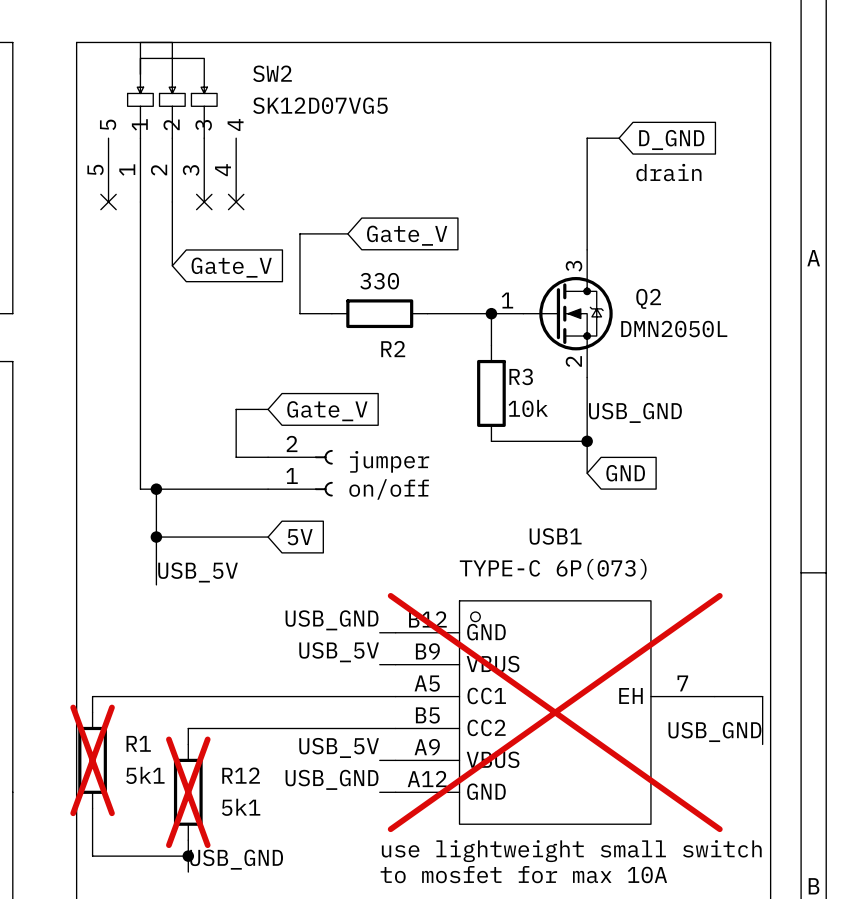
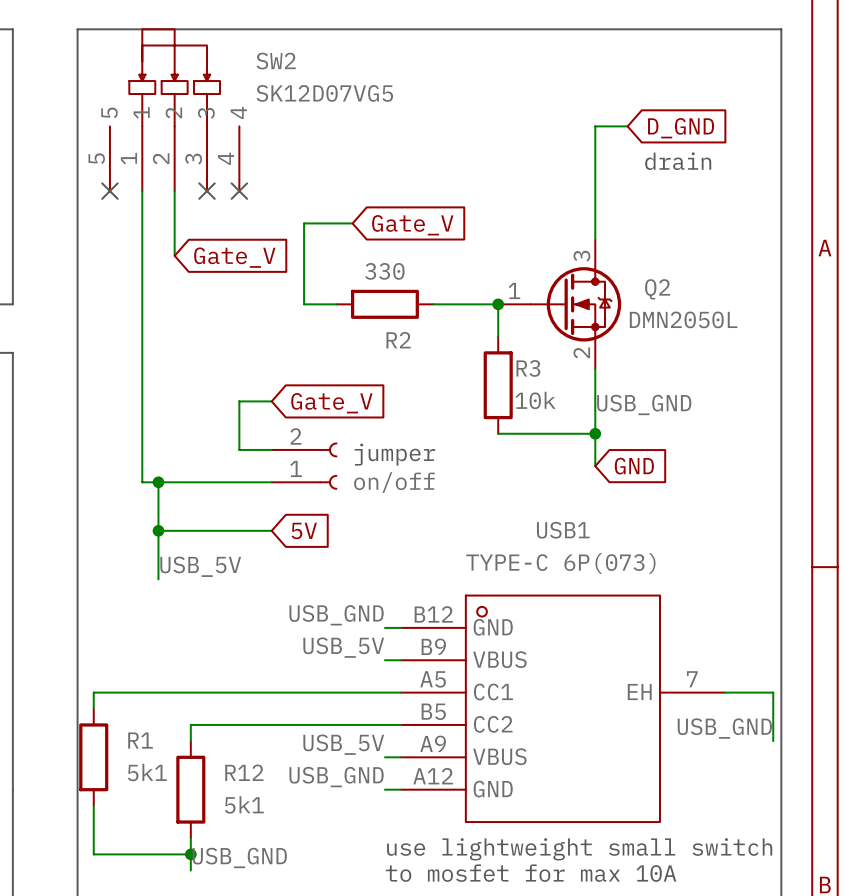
USB1 do-not-place cross: (555, 712) -> none
R1 do-not-place cross: (92, 760) -> none
R12 do-not-place cross: (188, 792) -> none

